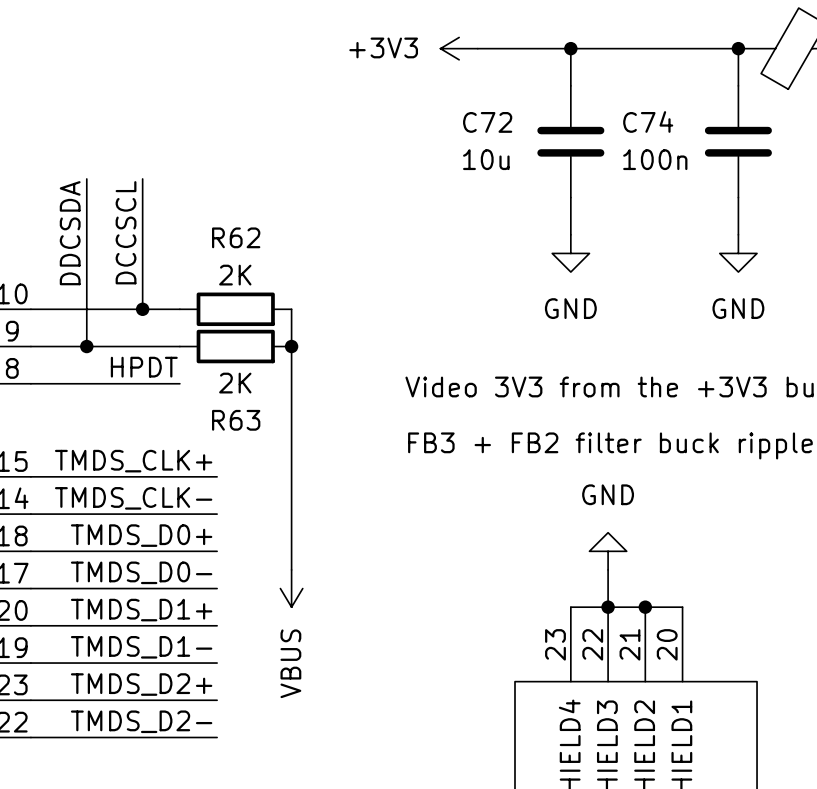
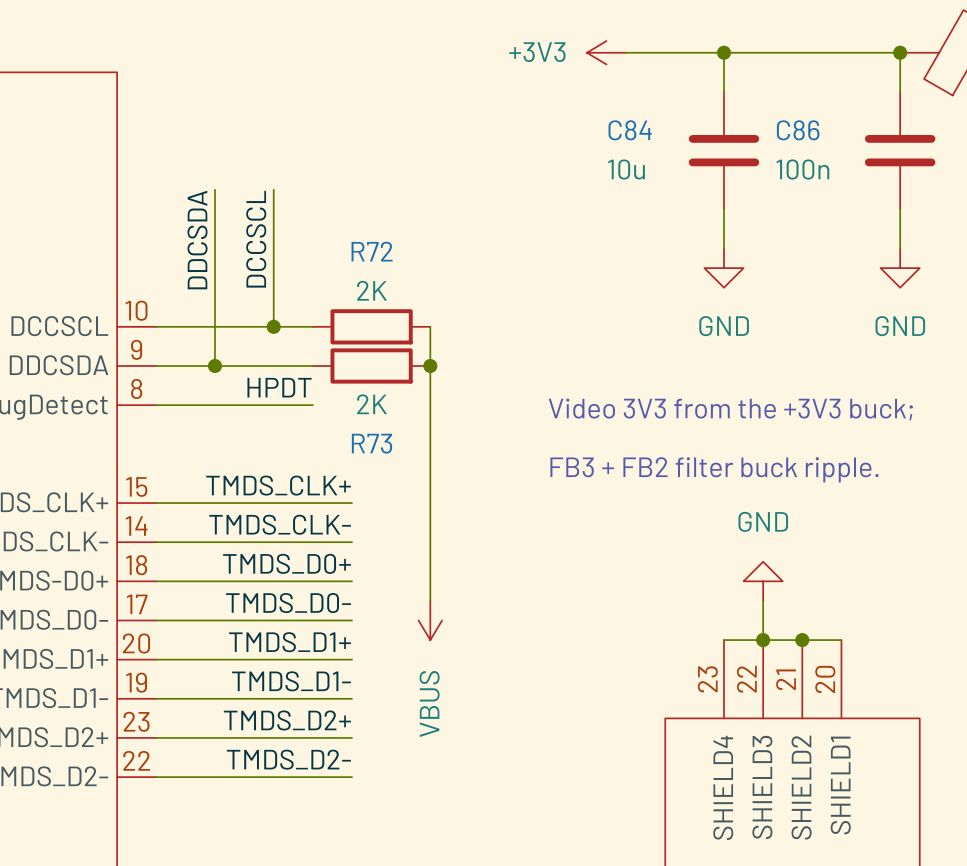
C74 name: C74 (648, 121) -> C86 (798, 130)
C72 name: C72 (487, 122) -> C84 (630, 130)
R62 name: R62 (236, 237) -> R72 (372, 251)
R63 name: R63 (236, 420) -> R73 (372, 443)

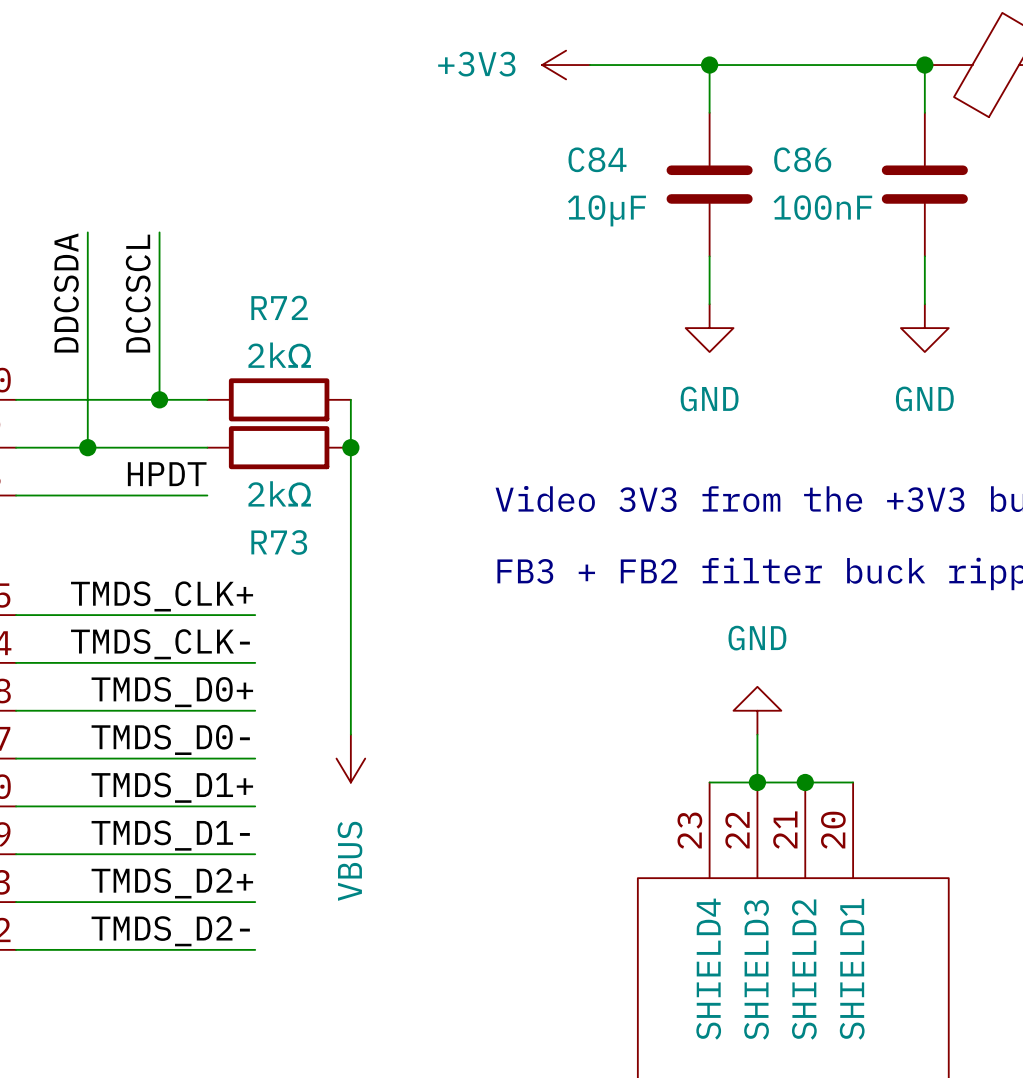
C84 value: 10u (626, 169) -> 10µF (606, 210)
C86 value: 100n (802, 169) -> 100nF (822, 207)
R72 value: 2K (372, 290) -> 2kΩ (279, 355)
R73 value: 2K (372, 404) -> 2kΩ (279, 493)

